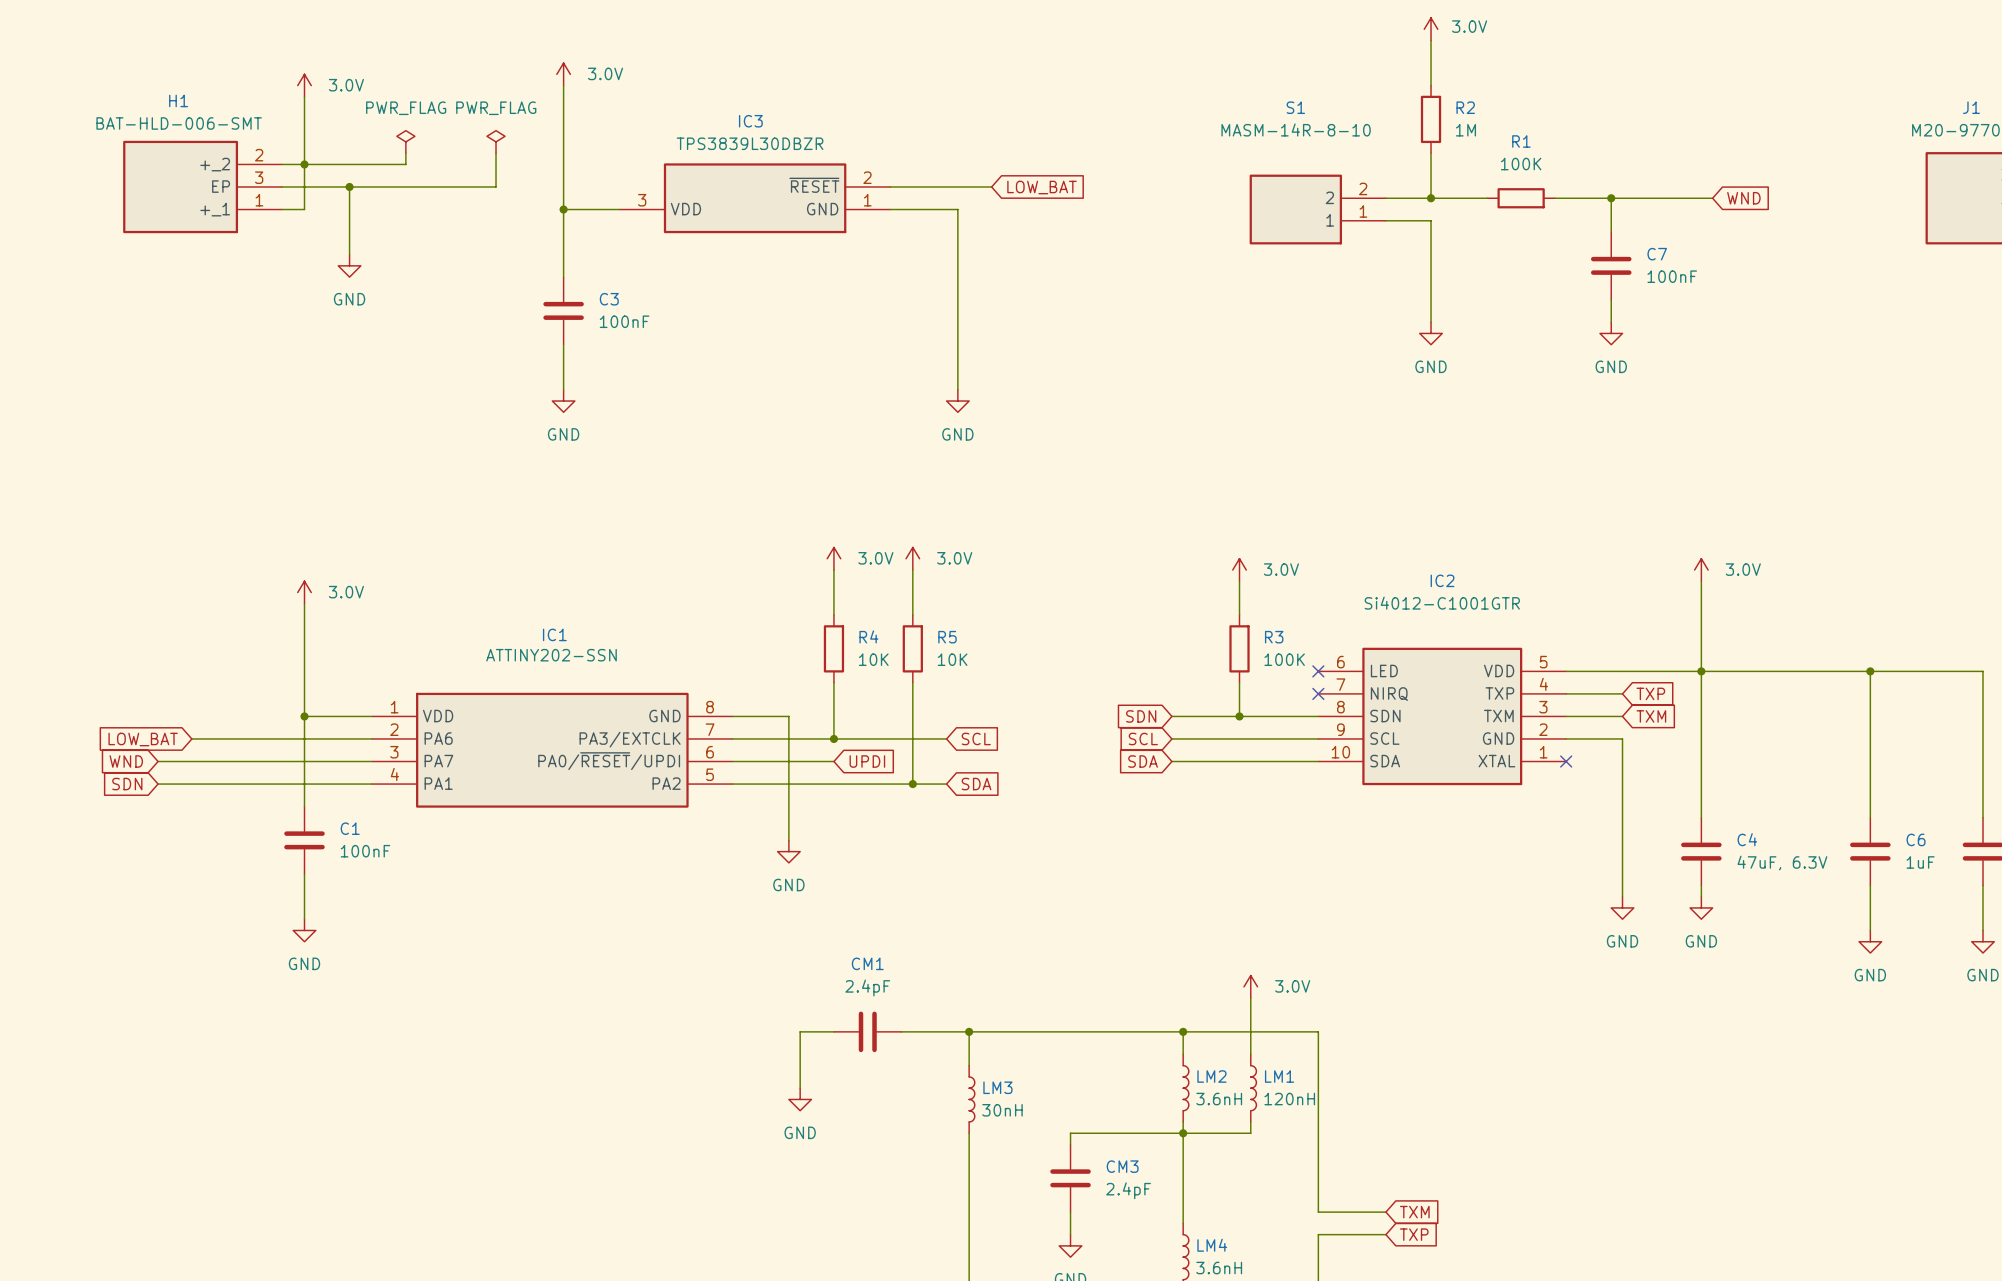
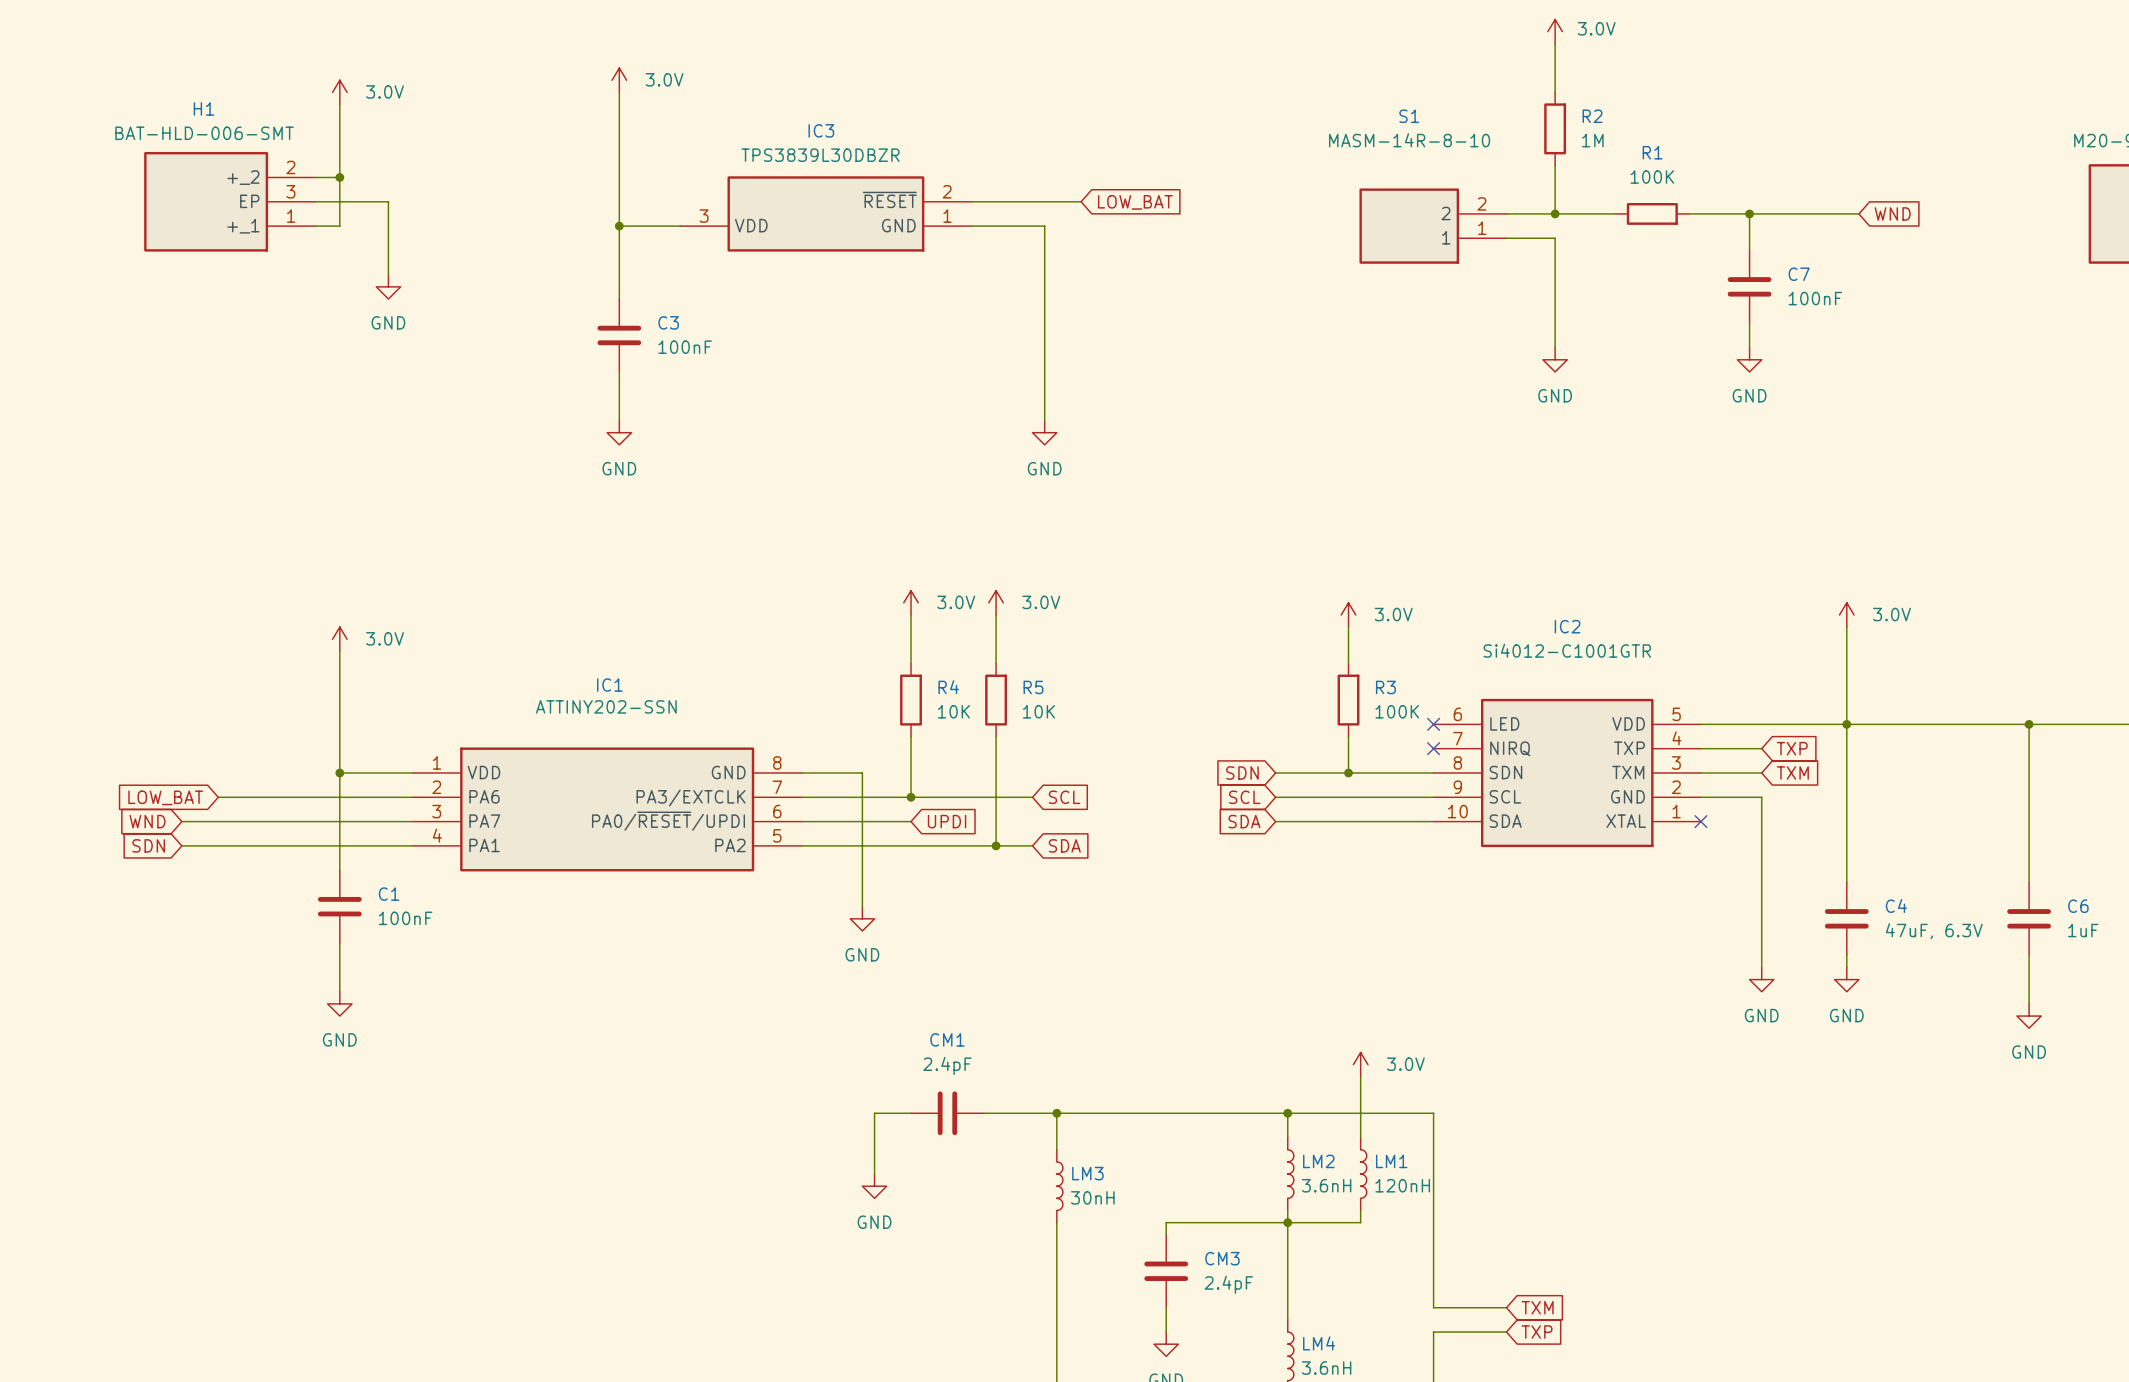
power symbol: PWR_FLAG (405, 141) -> none
power symbol: PWR_FLAG (496, 141) -> none
wire: (405, 153) (405, 164) (304, 164) -> none
wire: (496, 153) (496, 186) (349, 186) -> none
junction: (349, 186) -> none

